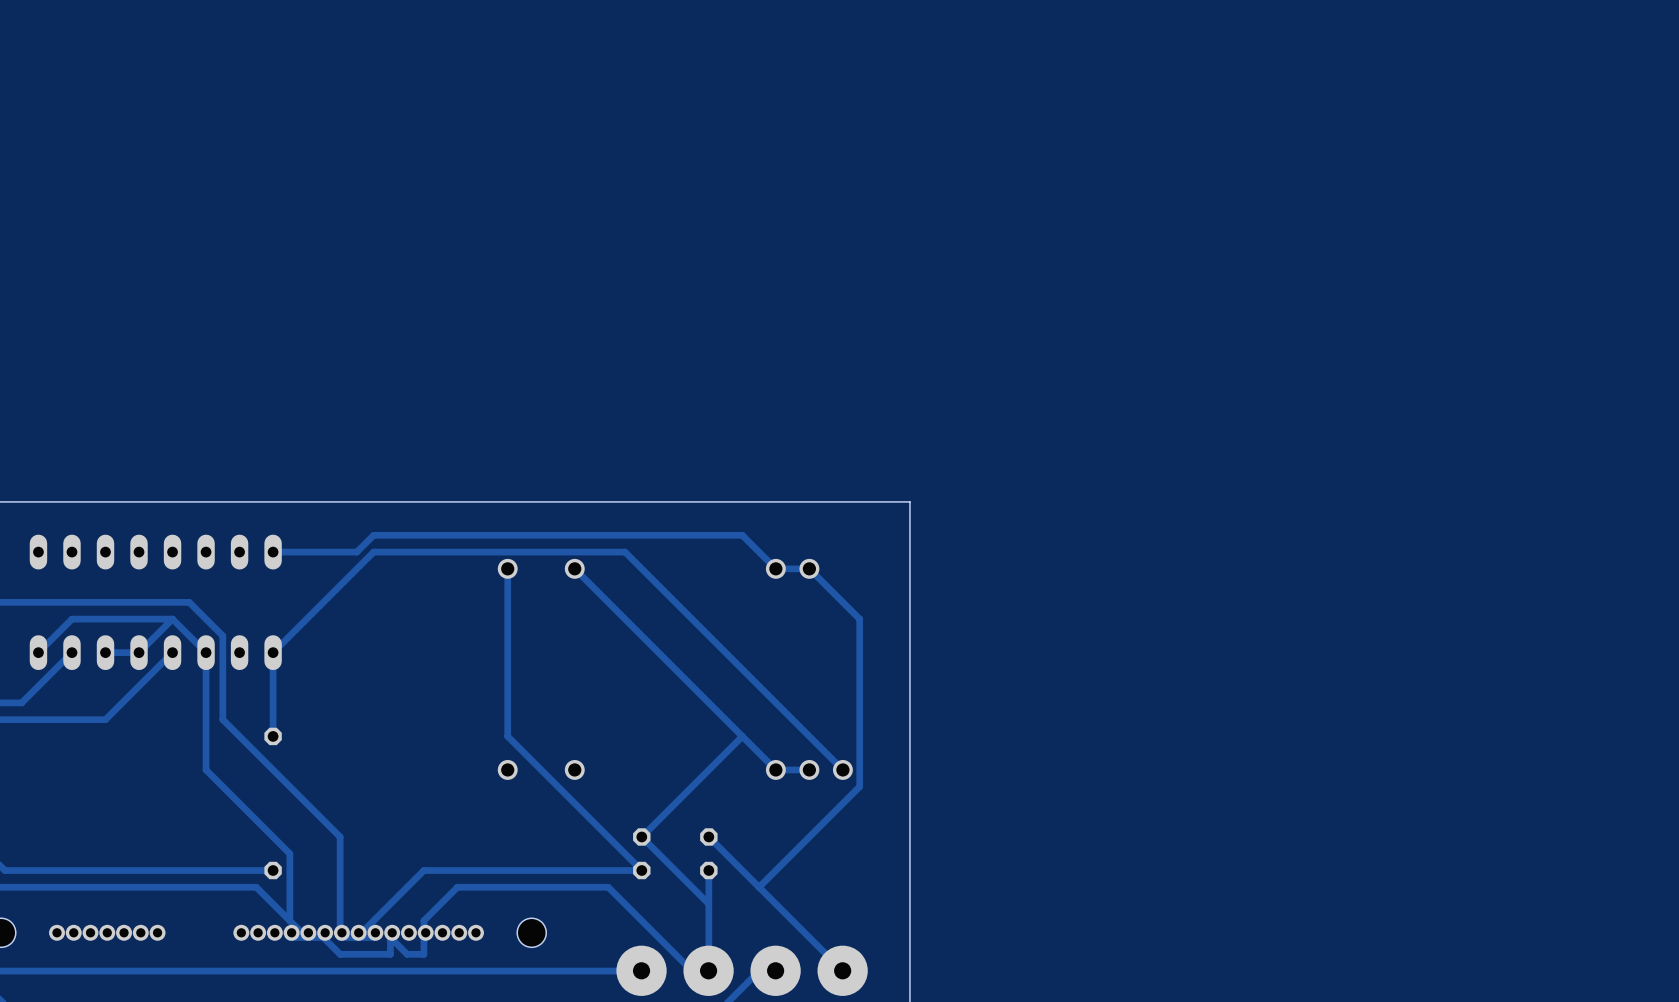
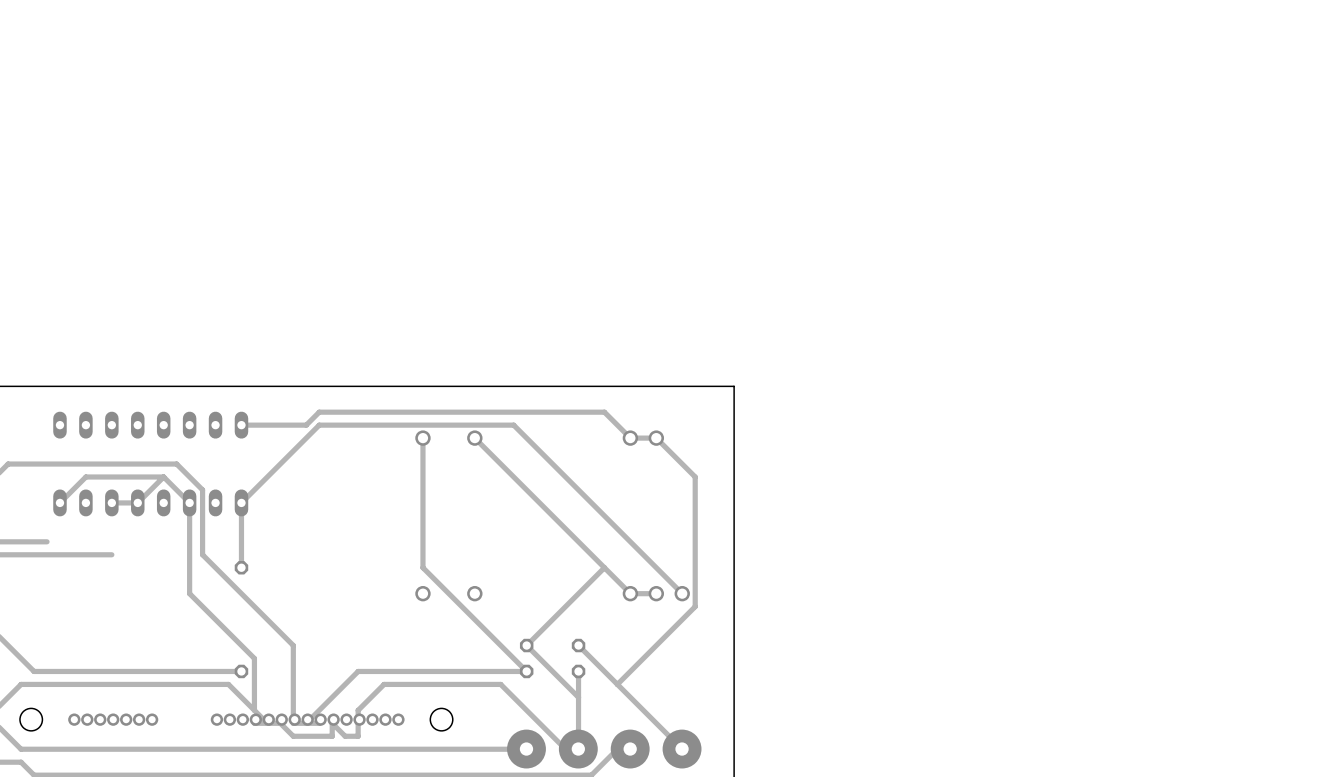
track: (71, 652) (21, 702) -> none
track: (172, 652) (105, 719) -> none

